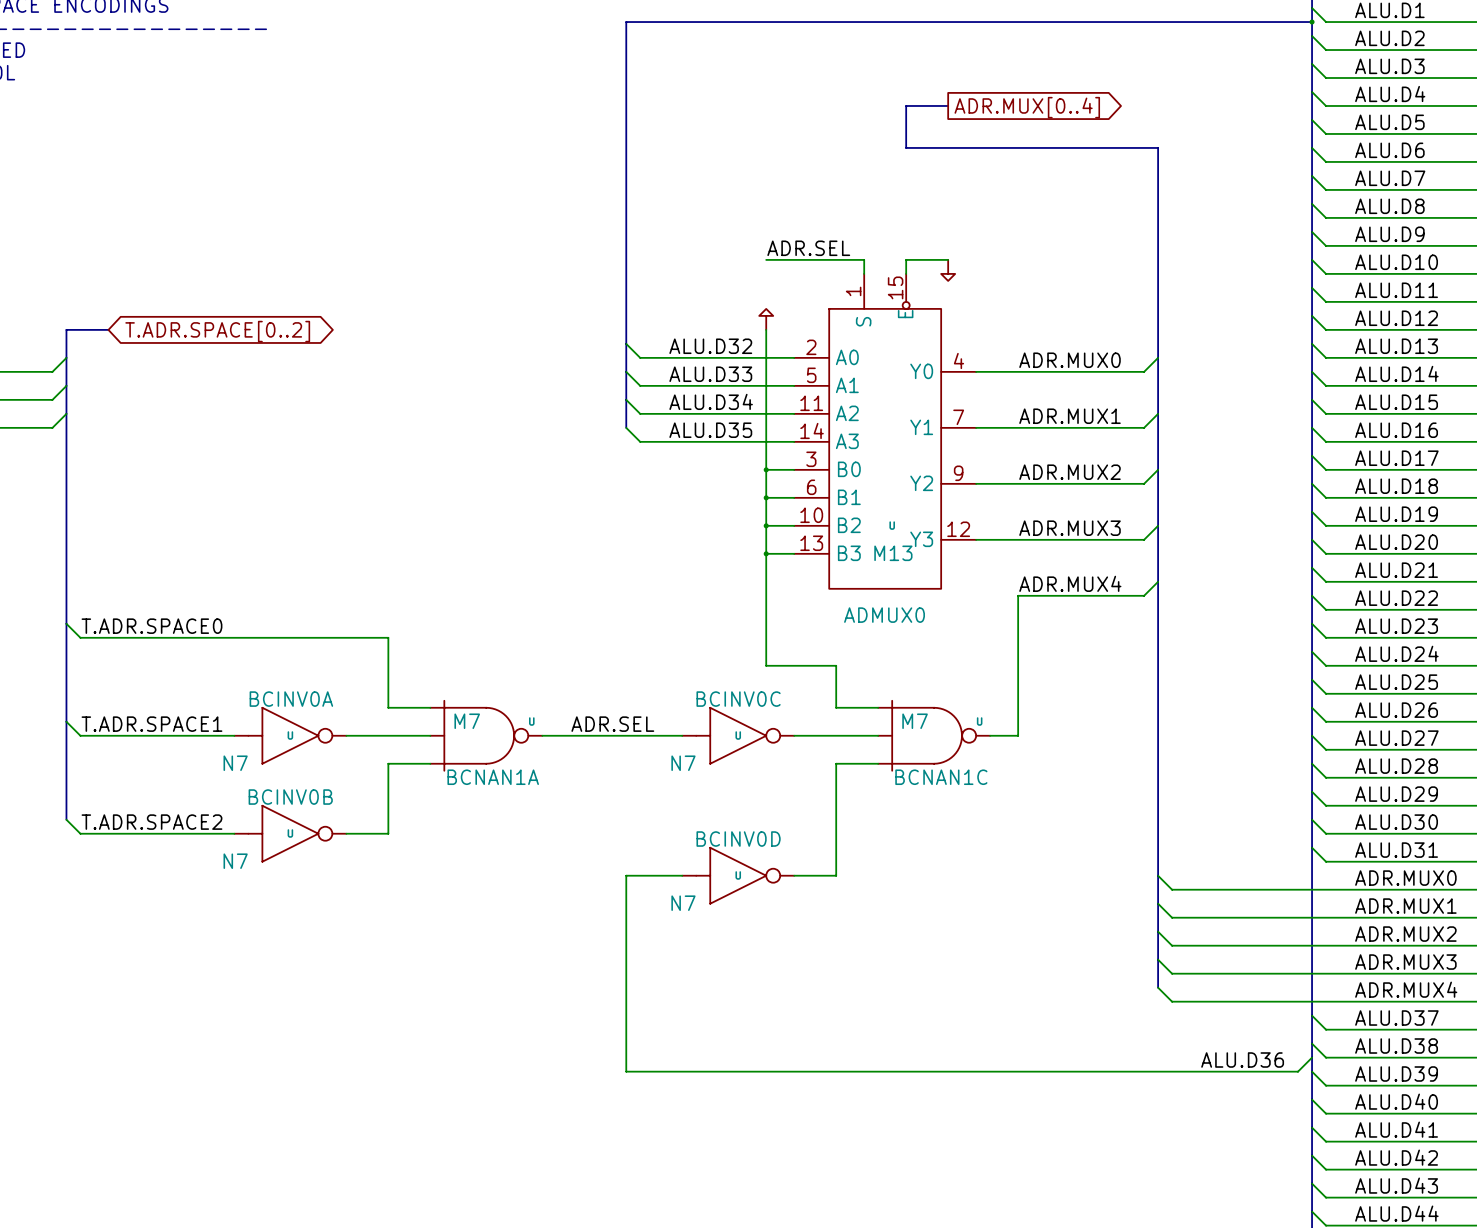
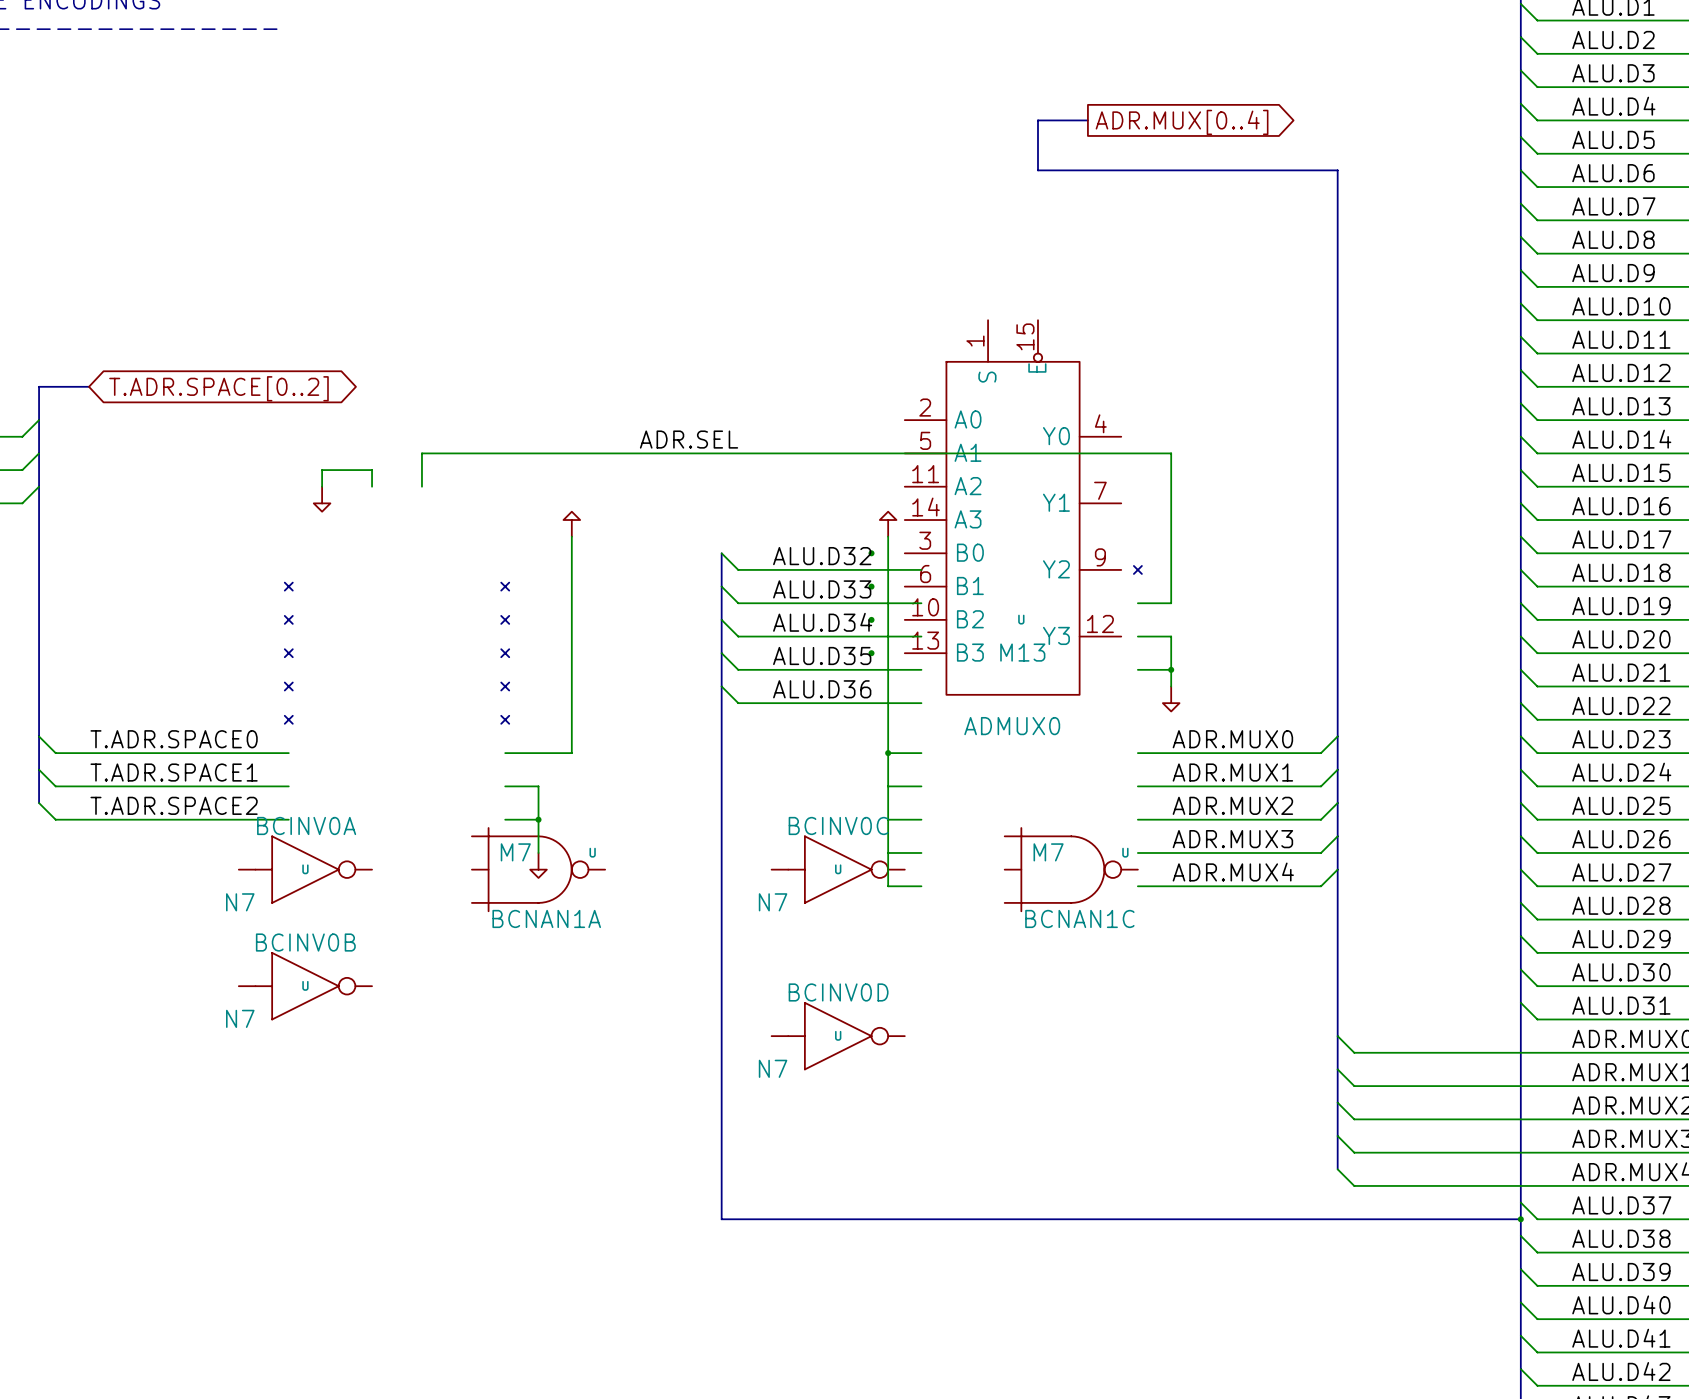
bus: (1312, 22) (626, 22) (626, 427) -> none
junction: (1312, 22) -> none
label: ADR.SEL (808, 248) -> none
wire: (766, 259) (864, 259) (864, 273) -> none
wire: (948, 259) (906, 259) (906, 273) -> none
power symbol: (948, 270) -> none
power symbol: (766, 319) -> none
wire: (766, 329) (766, 665) (780, 665) -> none
wire: (626, 343) (640, 357) (794, 357) -> (721, 553) (738, 569) (921, 569)
label position: ALU.D32 (710, 346) -> ALU.D32 (822, 556)
wire: (1158, 357) (1144, 371) (976, 371) -> none
label: ADR.MUX0 (1070, 360) -> none
wire: (626, 371) (640, 385) -> (421, 486) (421, 453) (721, 453)
label: none -> ADR.SEL (689, 439)
label position: ALU.D33 (710, 374) -> ALU.D33 (822, 589)
wire: none -> (904, 453) (1171, 453) (1171, 603) (1137, 603)
wire: (626, 399) (640, 413) (794, 413) -> (721, 619) (738, 636) (921, 636)
label position: ALU.D34 (711, 401) -> ALU.D34 (822, 622)
wire: none -> (322, 486) (322, 470) (372, 470) (372, 486)
wire: (1158, 413) (1144, 427) (976, 427) -> none
label: ADR.MUX1 (1070, 416) -> none
power symbol: none -> (322, 499)
wire: (626, 427) (640, 441) (794, 441) -> (721, 653) (738, 669) (921, 669)
label position: ALU.D35 (710, 430) -> ALU.D35 (822, 655)
power symbol: none -> (571, 523)
power symbol: none -> (888, 523)
wire: none -> (571, 536) (571, 753) (505, 753)
wire: none -> (888, 536) (888, 886) (921, 886)
bus: none -> (721, 553) (721, 1219) (1520, 1219)
wire: (766, 469) (794, 469) -> none
wire: (1158, 469) (1144, 483) (976, 483) -> none
label: ADR.MUX2 (1070, 472) -> none
no-connect mark: none -> (1137, 569)
no-connect mark: none -> (288, 586)
no-connect mark: none -> (505, 586)
wire: none -> (721, 586) (738, 603) (921, 603)
wire: (766, 497) (794, 497) -> none
no-connect mark: none -> (288, 619)
no-connect mark: none -> (505, 619)
wire: (766, 525) (794, 525) -> none
wire: (1158, 525) (1144, 539) (1018, 539) -> (1171, 686) (1171, 636)
label: ADR.MUX3 (1070, 528) -> none
wire: (976, 539) (990, 539) -> none
no-connect mark: none -> (288, 653)
no-connect mark: none -> (505, 653)
wire: (766, 553) (794, 553) -> (888, 753) (921, 753)
wire: none -> (1137, 669) (1171, 669)
junction: none -> (1171, 669)
no-connect mark: none -> (288, 686)
no-connect mark: none -> (505, 686)
wire: none -> (721, 686) (738, 703) (921, 703)
wire: (1158, 581) (1144, 595) (1018, 595) (1018, 735) (990, 735) -> none
label: ADR.MUX4 (1070, 583) -> none
label: none -> ALU.D36 (822, 689)
power symbol: none -> (1171, 699)
no-connect mark: none -> (288, 719)
no-connect mark: none -> (505, 719)
wire: none -> (1337, 736) (1321, 753) (1137, 753)
label position: T.ADR.SPACE0 (151, 626) -> T.ADR.SPACE0 (174, 739)
label: none -> ADR.MUX0 (1232, 739)
wire: (276, 637) (388, 637) (388, 707) (430, 707) -> none
junction: none -> (888, 753)
wire: none -> (39, 769) (55, 786) (288, 786)
wire: none -> (1337, 769) (1321, 786) (1137, 786)
label: none -> ADR.MUX1 (1232, 772)
wire: none -> (505, 786) (538, 786) (538, 852)
wire: (808, 665) (836, 665) (836, 707) (878, 707) -> none
wire: none -> (39, 803) (55, 819) (288, 819)
bus: (66, 679) (66, 819) -> none
wire: none -> (1337, 803) (1321, 819) (1137, 819)
label: none -> T.ADR.SPACE2 (174, 805)
label: none -> ADR.MUX2 (1232, 805)
wire: none -> (505, 819) (538, 819)
junction: none -> (538, 819)
wire: none -> (888, 819) (921, 819)
wire: none -> (1337, 836) (1321, 852) (1137, 852)
label: none -> ADR.MUX3 (1232, 839)
wire: (66, 721) (80, 735) (234, 735) -> none
wire: none -> (888, 852) (921, 852)
label position: T.ADR.SPACE1 (151, 724) -> T.ADR.SPACE1 (174, 772)
label: ADR.SEL (612, 724) -> none
power symbol: none -> (538, 865)
wire: (346, 735) (430, 735) -> none
wire: (542, 735) (682, 735) -> none
wire: (794, 735) (878, 735) -> none
wire: none -> (1337, 869) (1321, 886) (1137, 886)
label: none -> ADR.MUX4 (1233, 872)
wire: (430, 763) (388, 763) (388, 833) (346, 833) -> none
wire: (878, 763) (836, 763) (836, 875) (794, 875) -> none
wire: (66, 819) (80, 833) (234, 833) -> none
label: T.ADR.SPACE2 (151, 822) -> none
wire: (682, 875) (626, 875) (626, 1071) (1298, 1071) (1312, 1057) -> none
junction: none -> (1520, 1219)
label: ALU.D36 (1242, 1060) -> none

